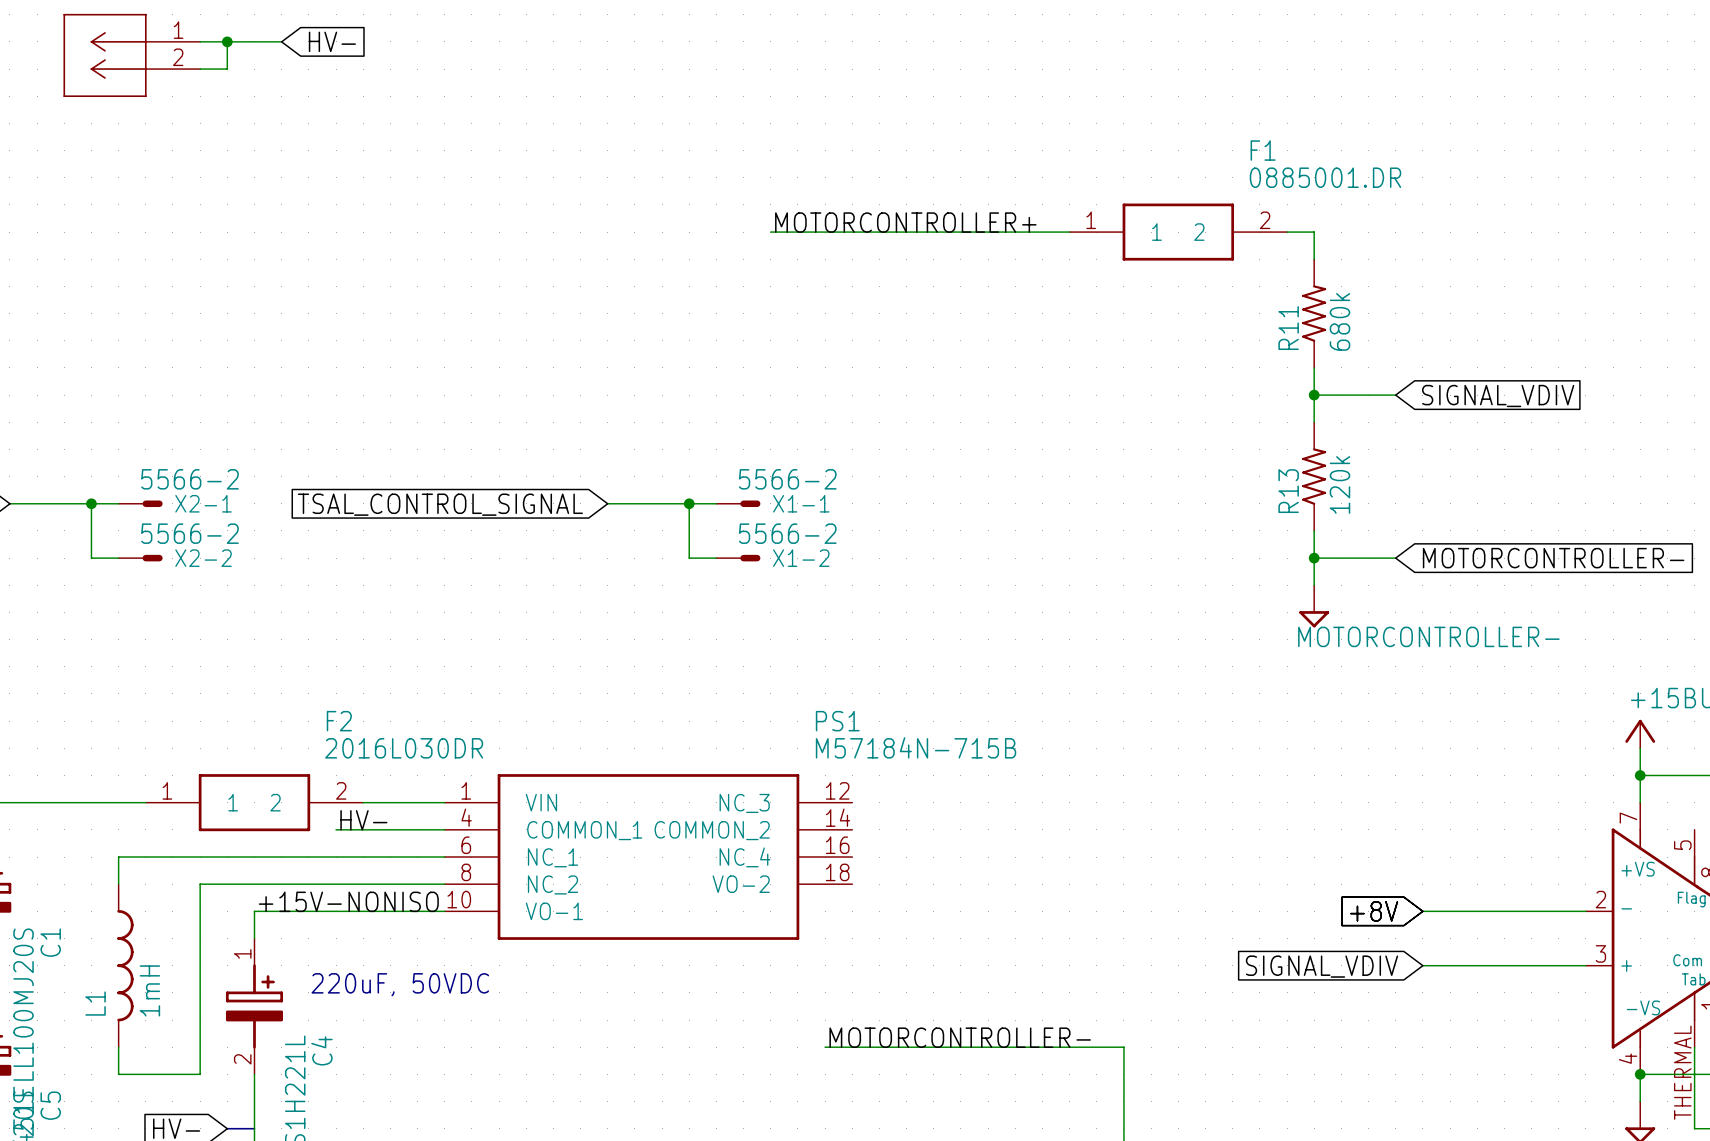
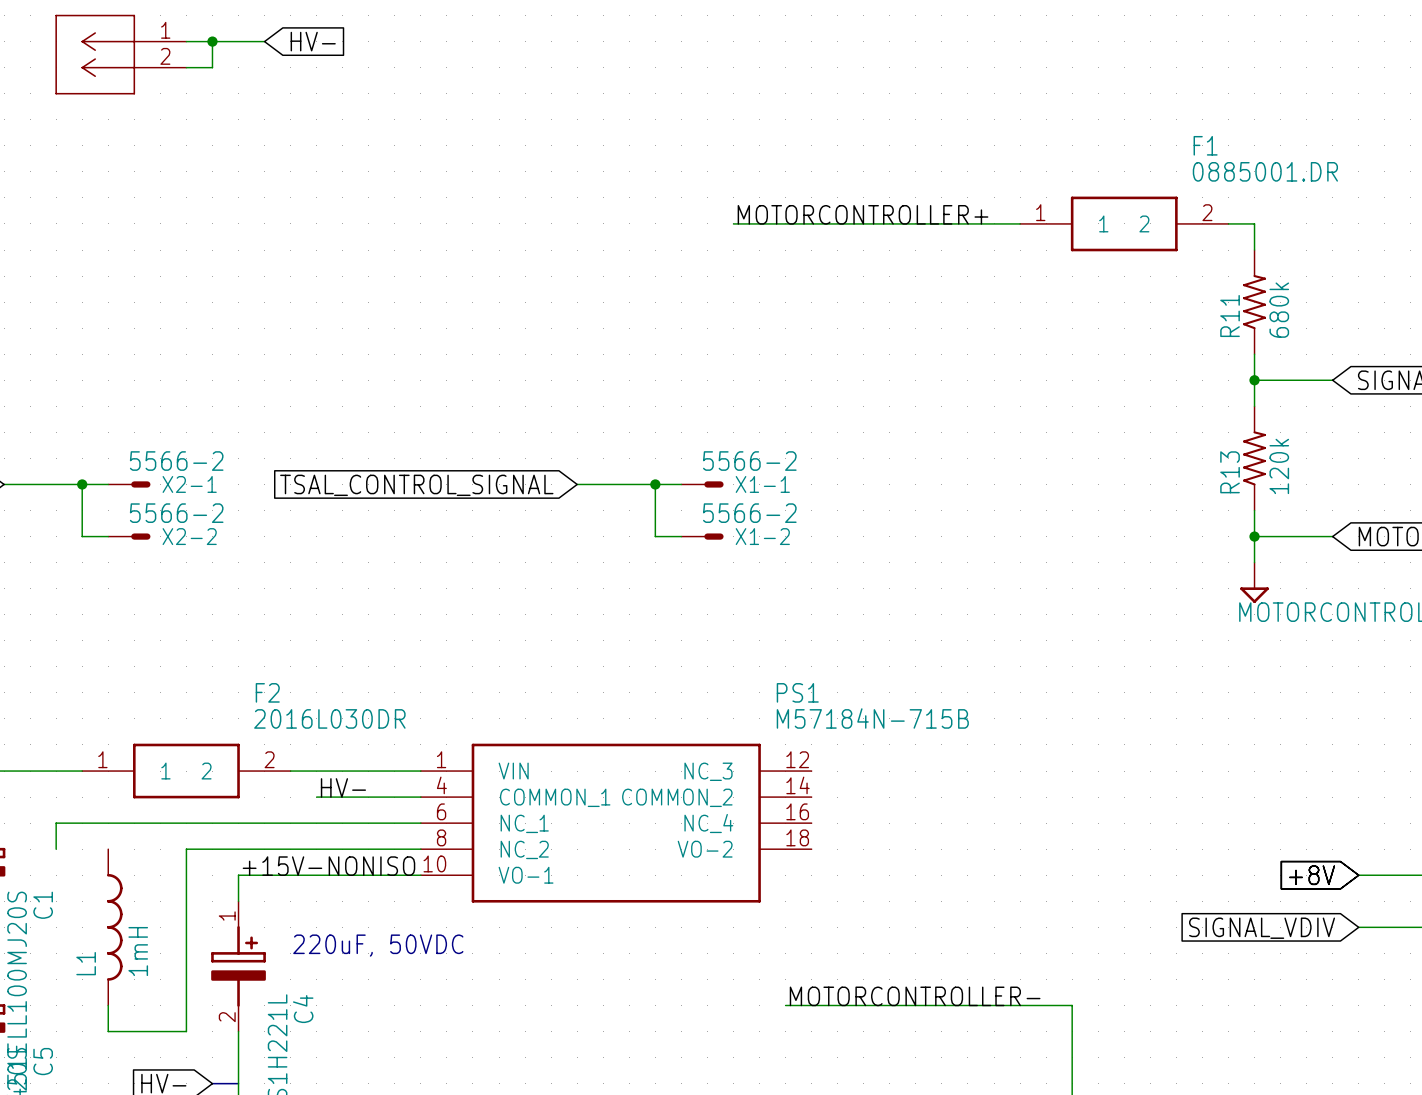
F2 position: (254, 802) -> (186, 771)
wire: (118, 857) (118, 884) -> (108, 823) (56, 823) (56, 849)

